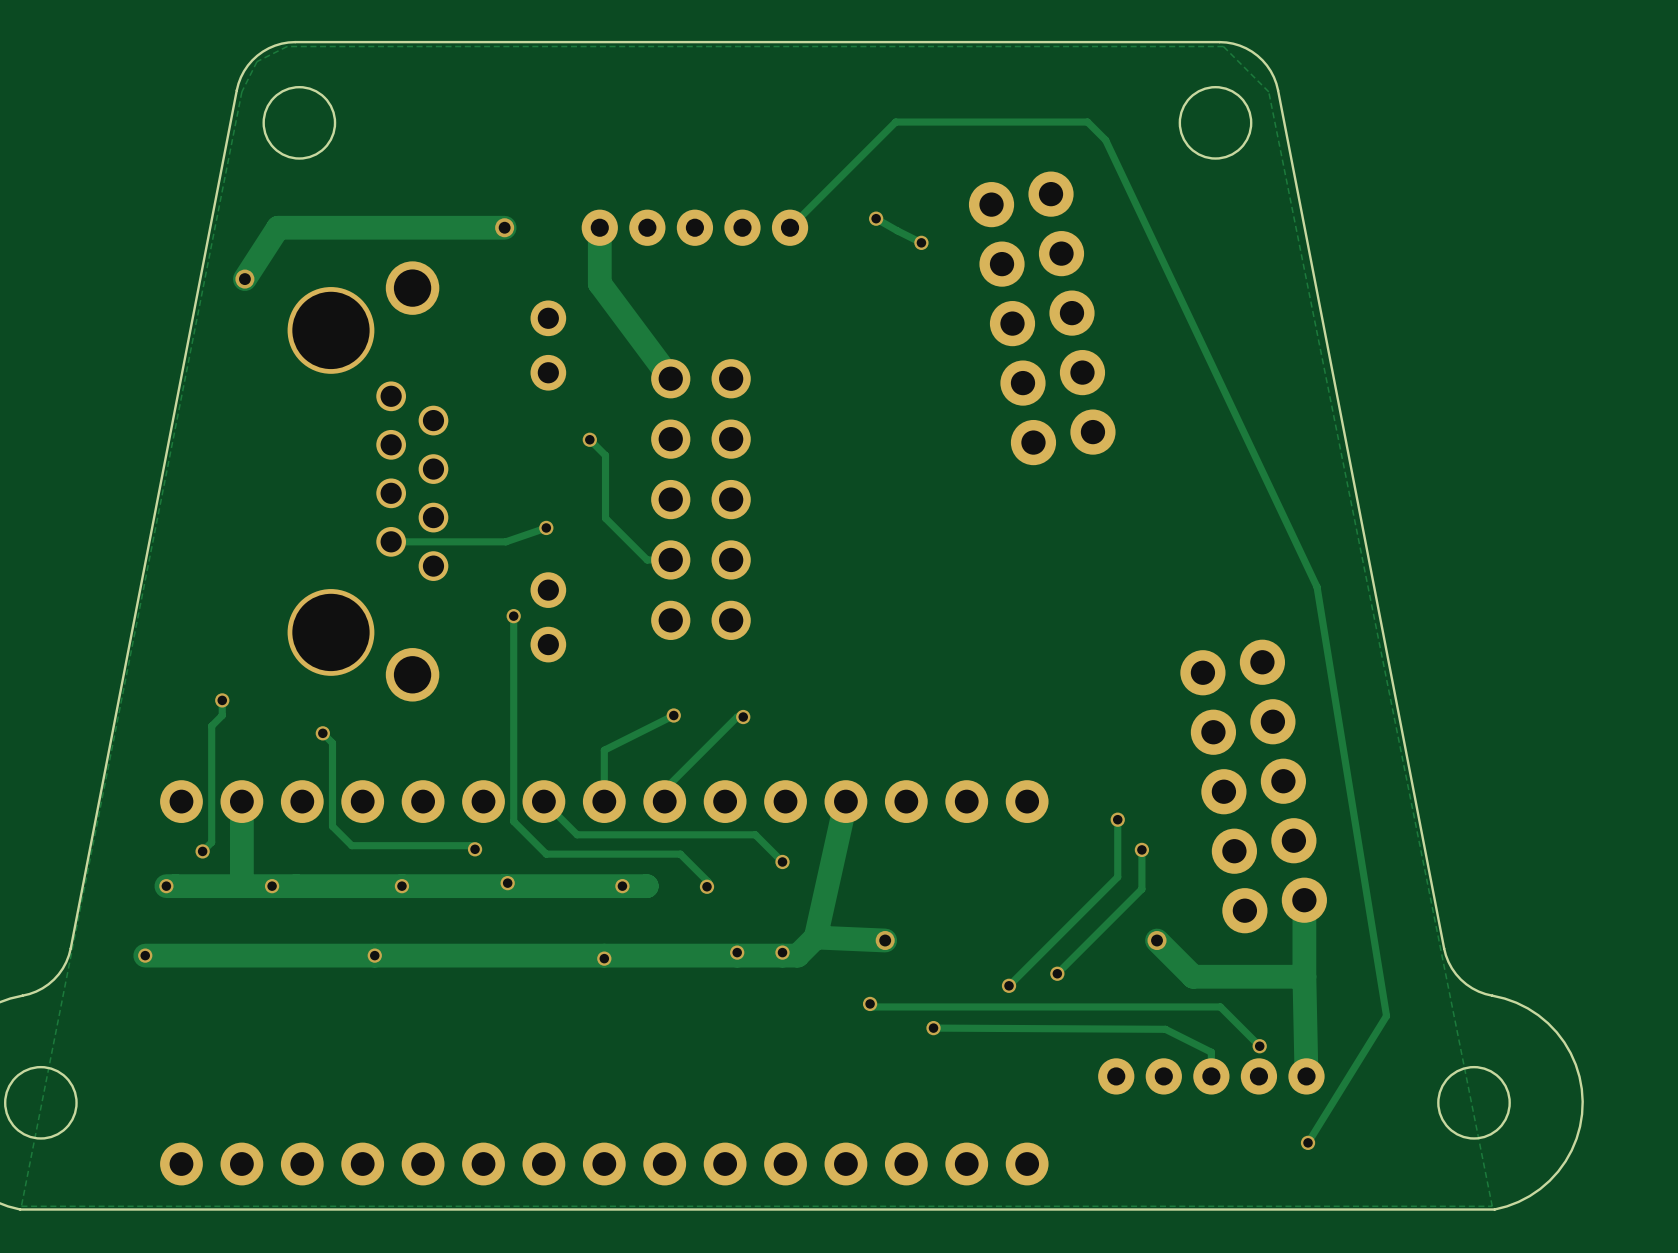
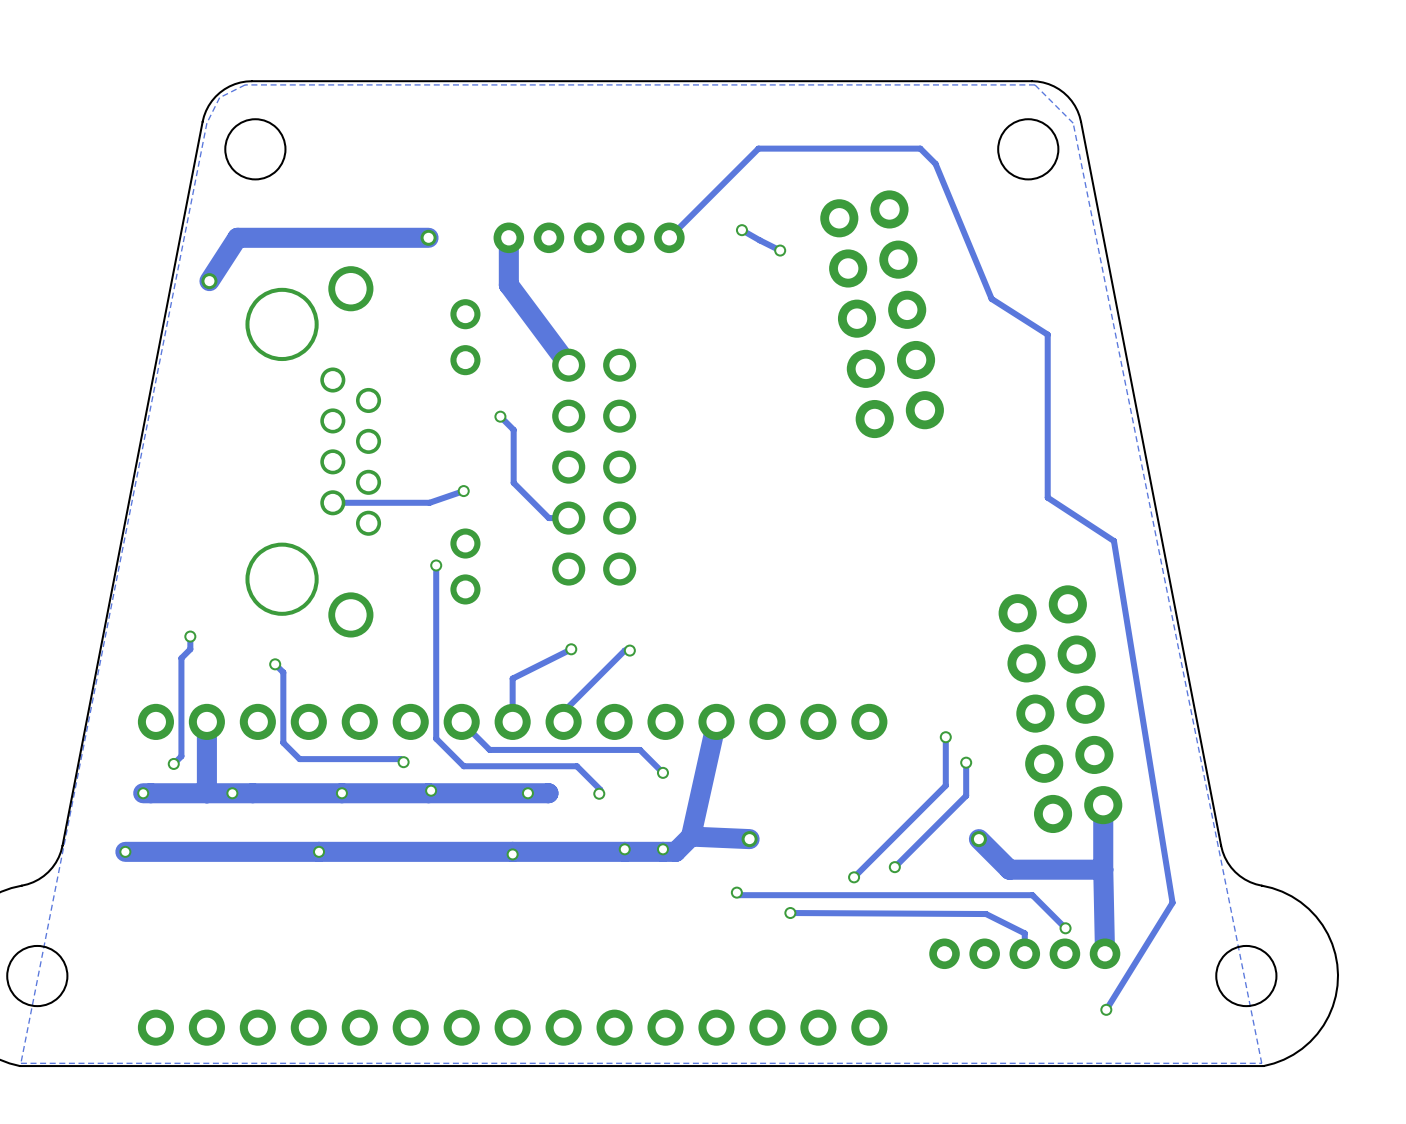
track: (1105, 140) (1317, 587) -> (935, 163) (991, 298) (1047, 334) (1047, 497) (1113, 541)

